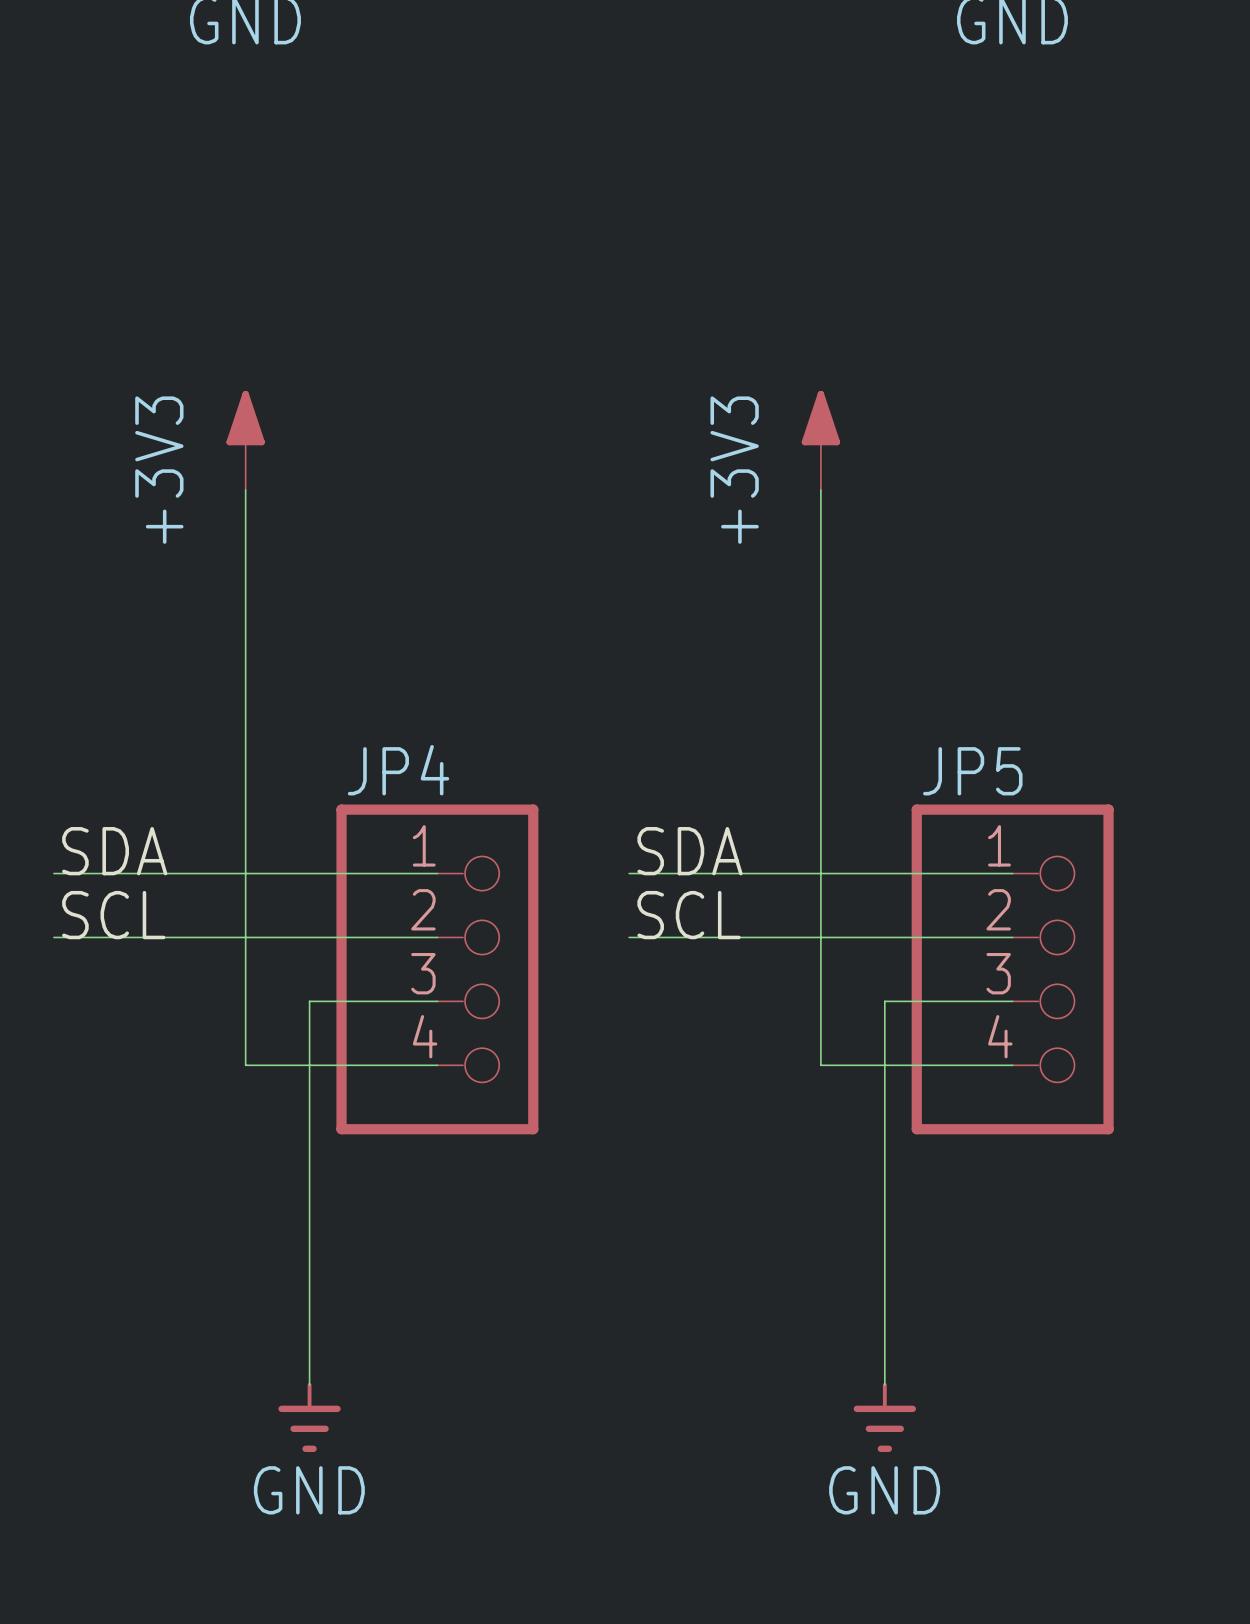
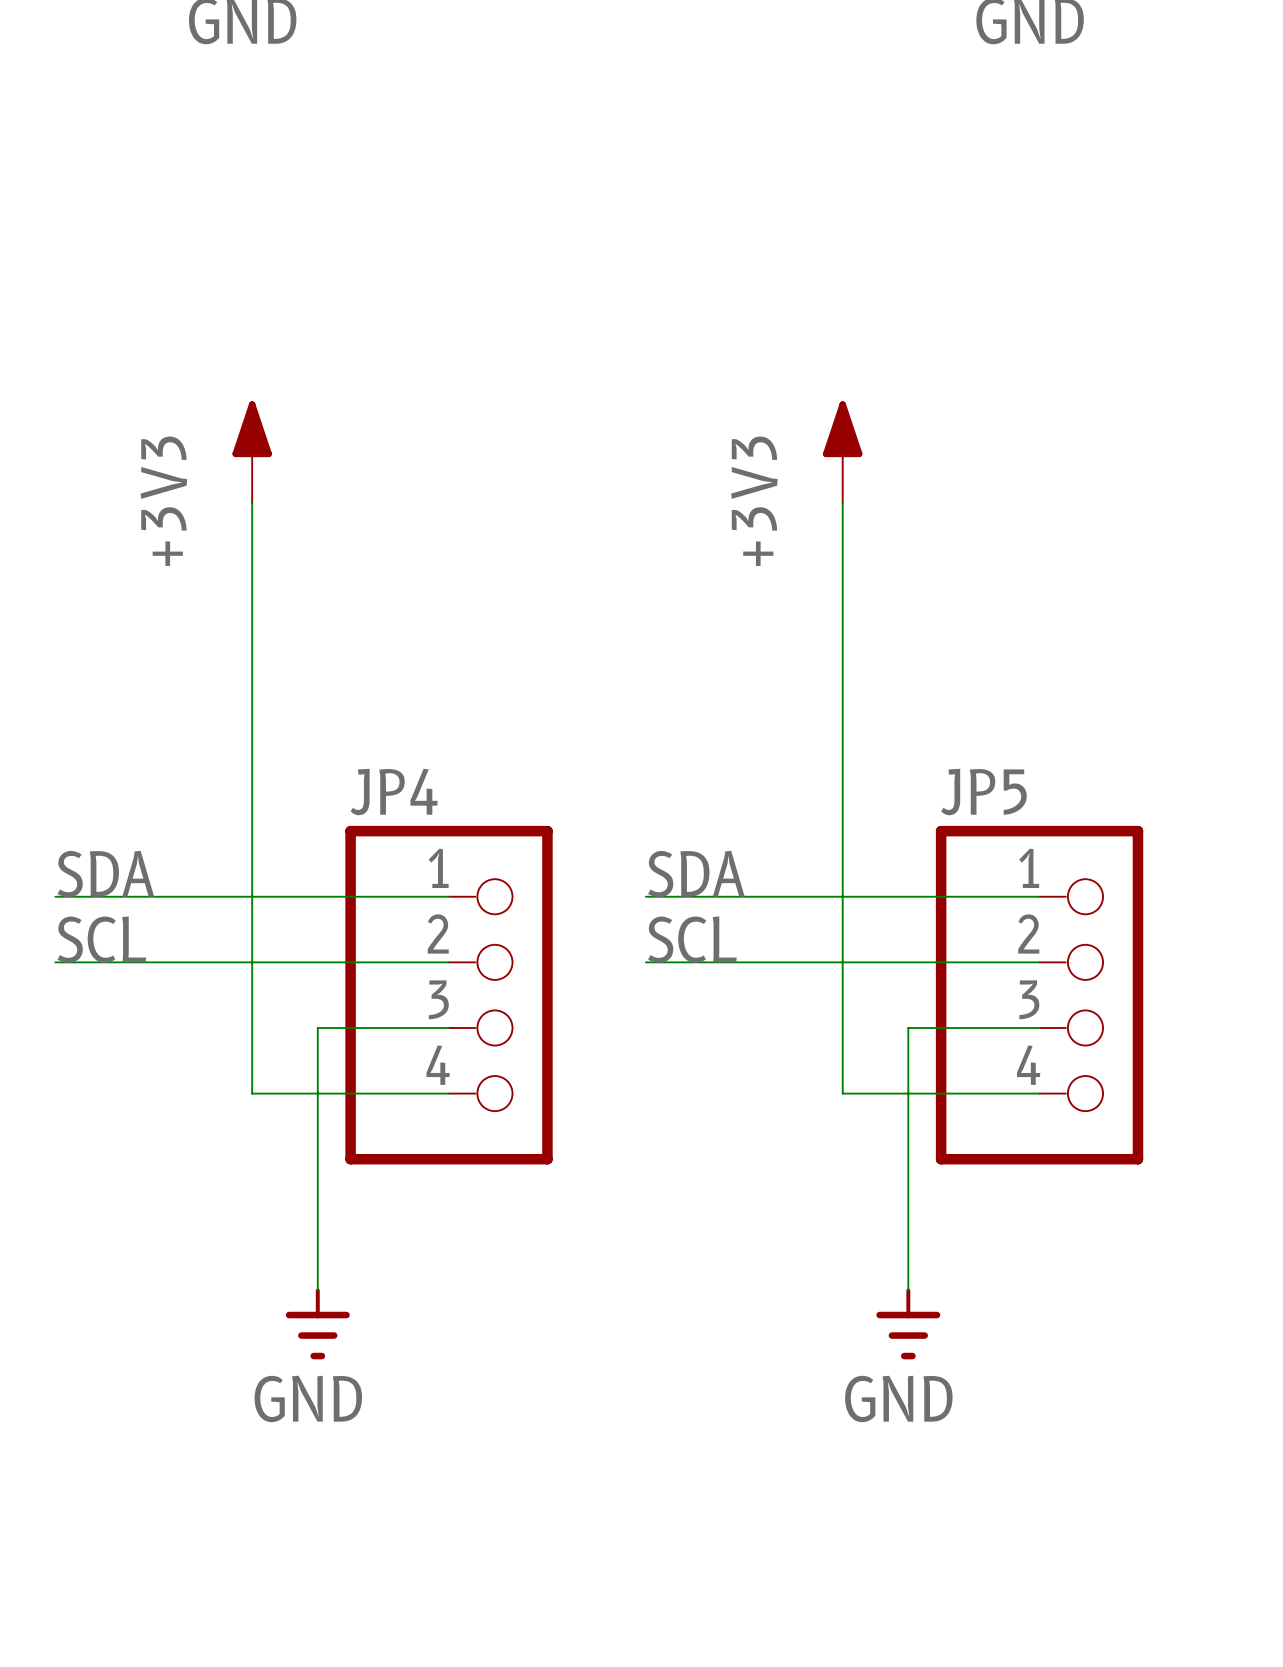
wire: (309, 1257) (309, 1384) -> none
wire: (884, 1257) (884, 1384) -> none
power symbol position: GND (309, 1417) -> GND (317, 1323)
power symbol position: GND (884, 1417) -> GND (908, 1323)

